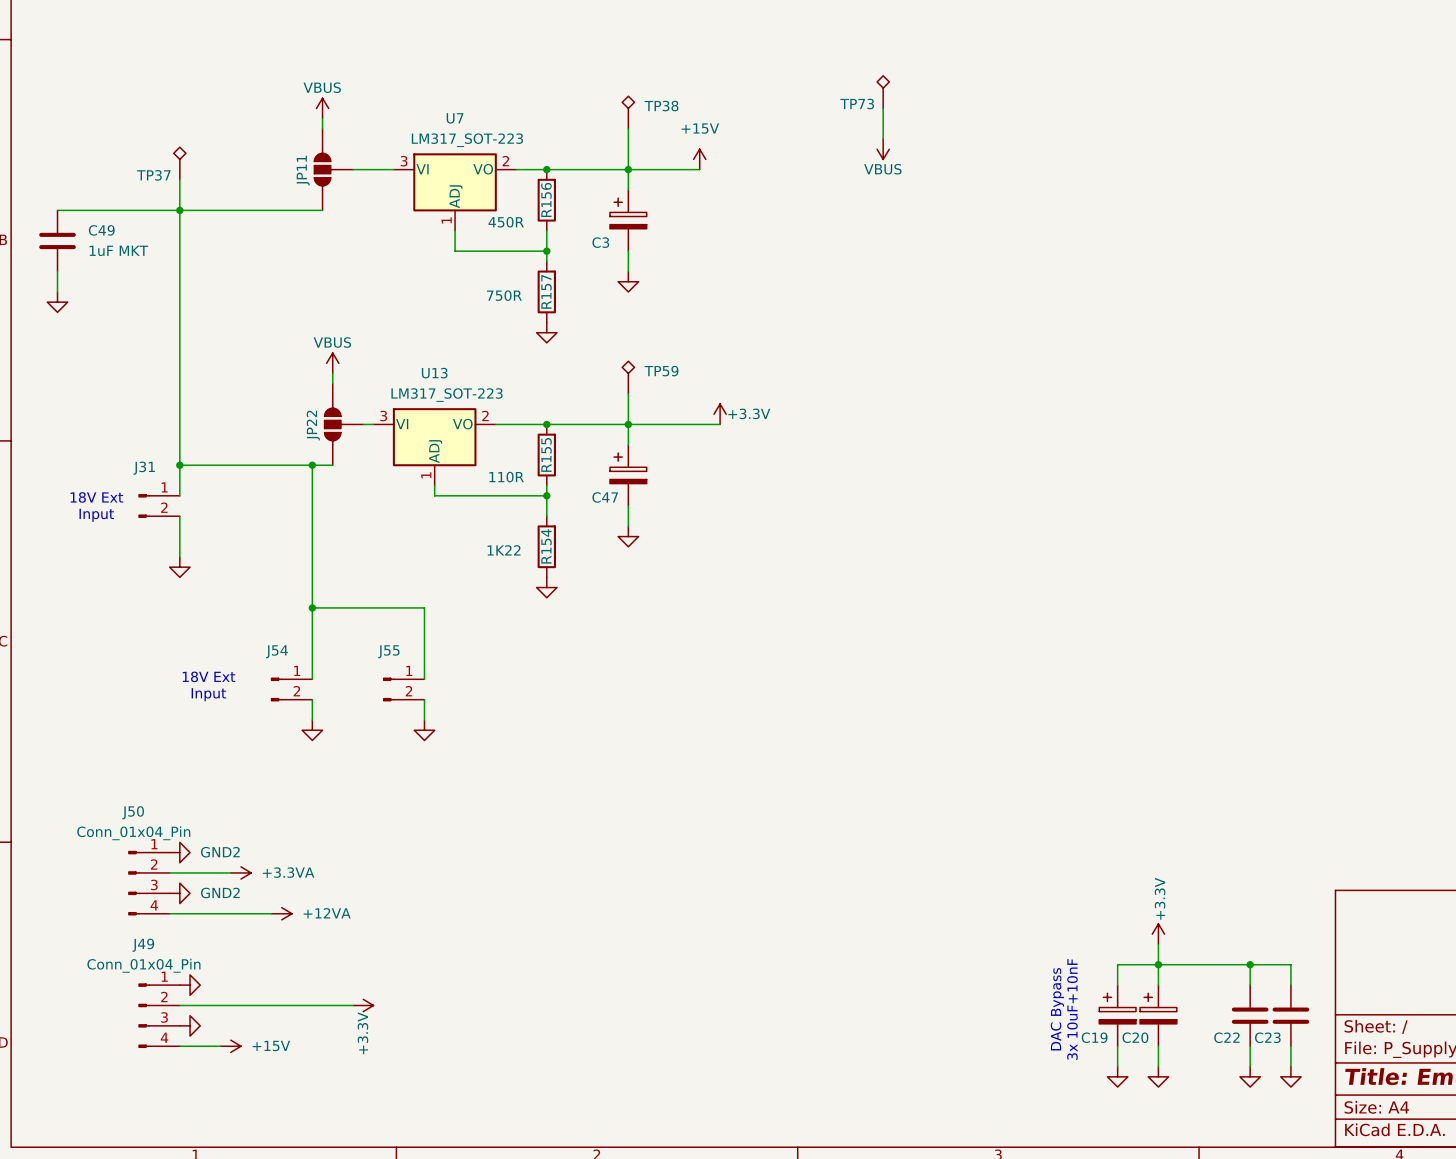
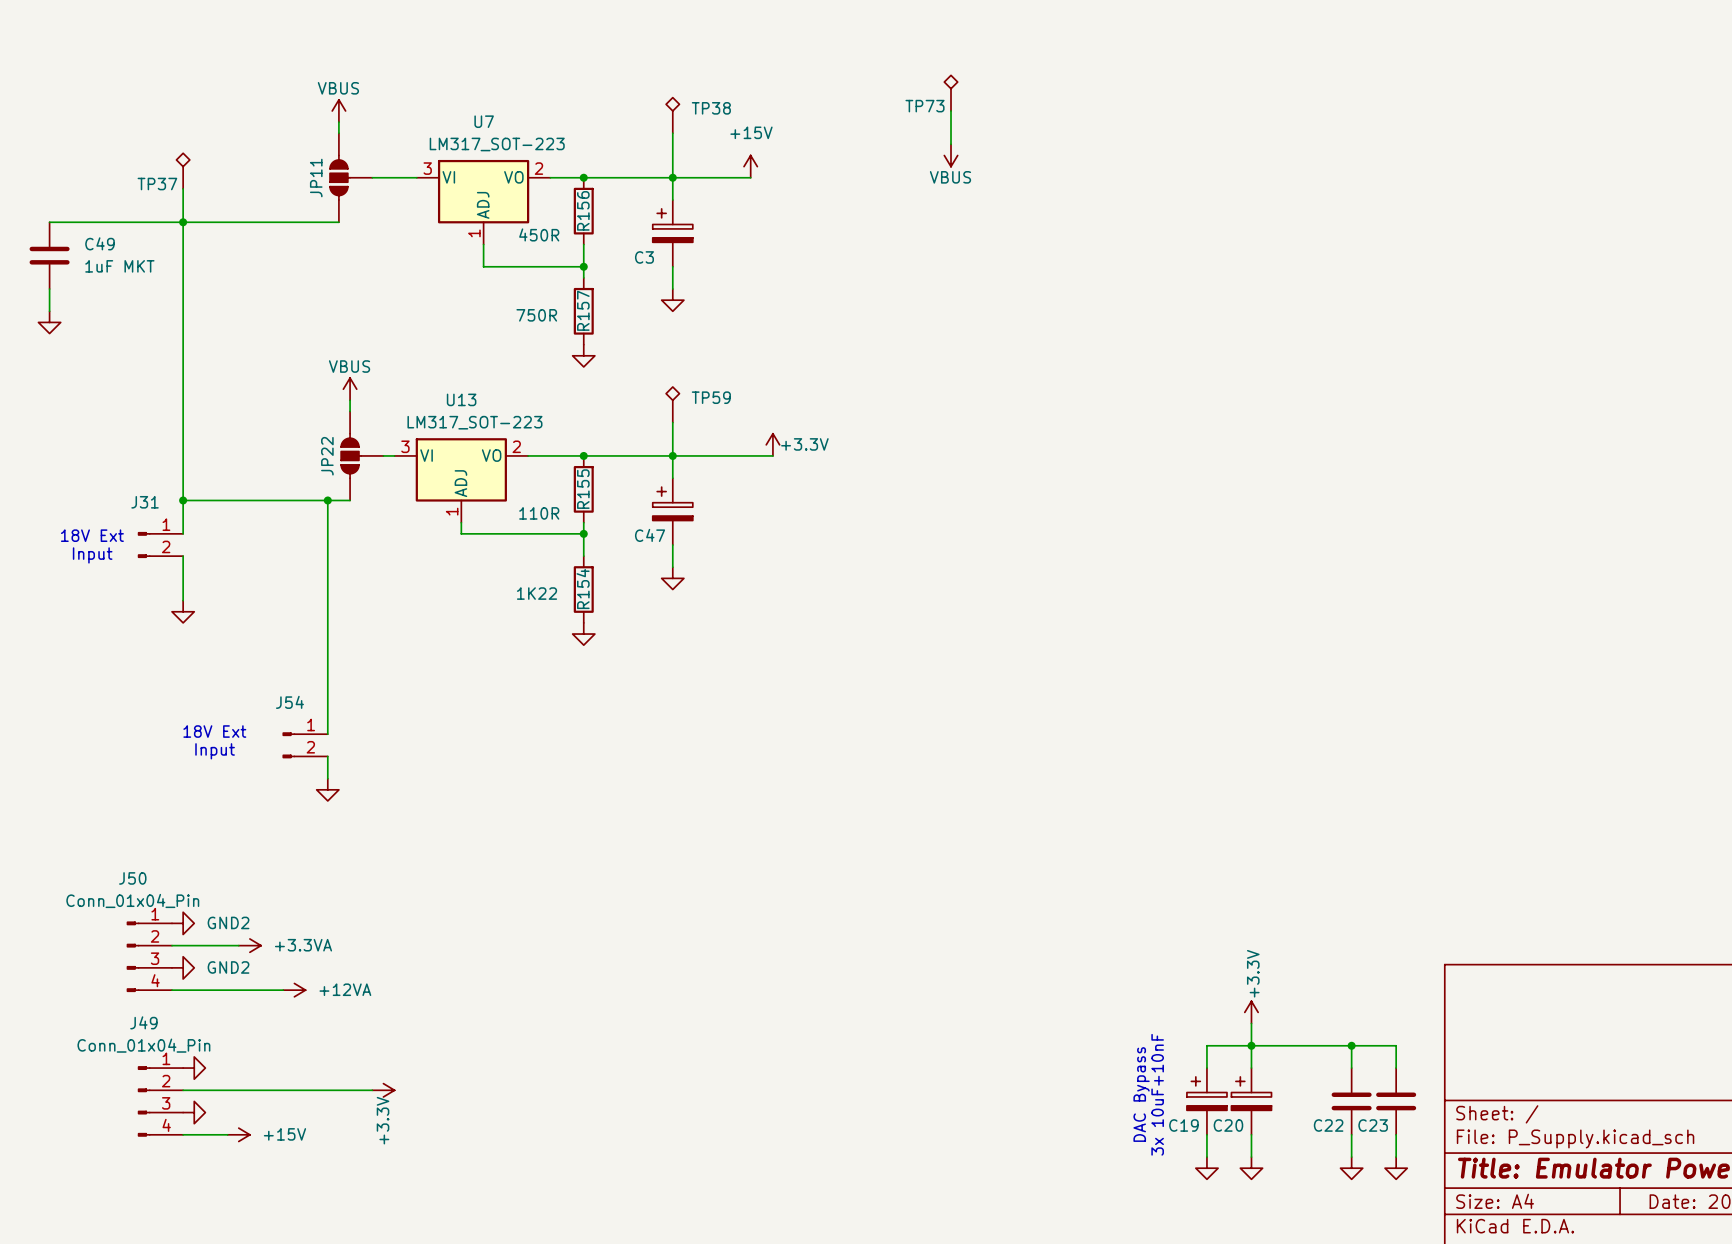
wire: (312, 607) (424, 607) (424, 679) -> none
junction: (312, 607) -> none
J55: (403, 689) -> none
wire: (424, 699) (424, 720) -> none
power symbol: (424, 730) -> none

